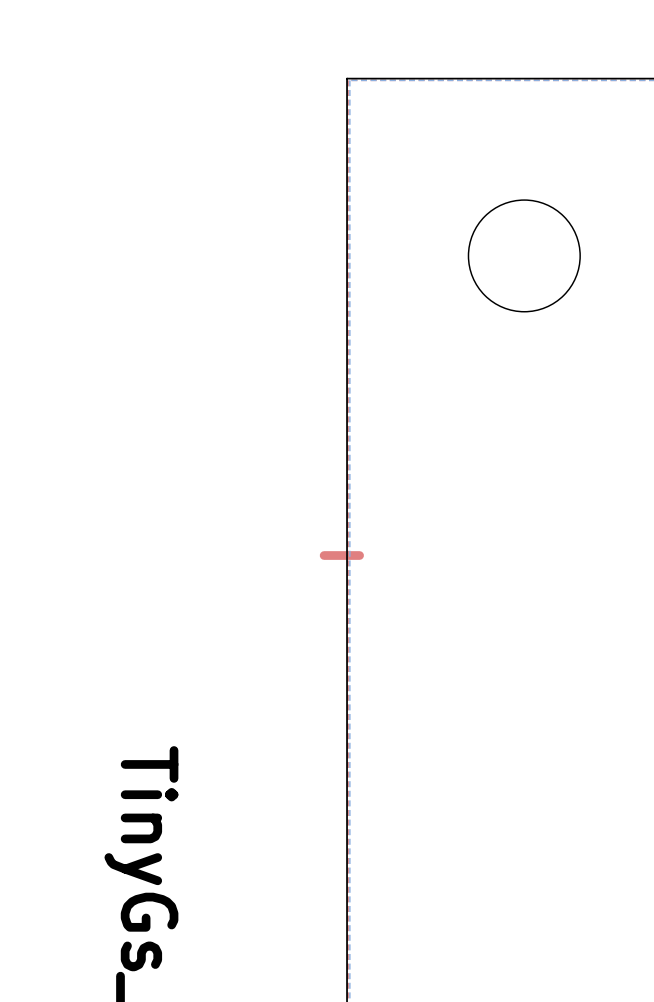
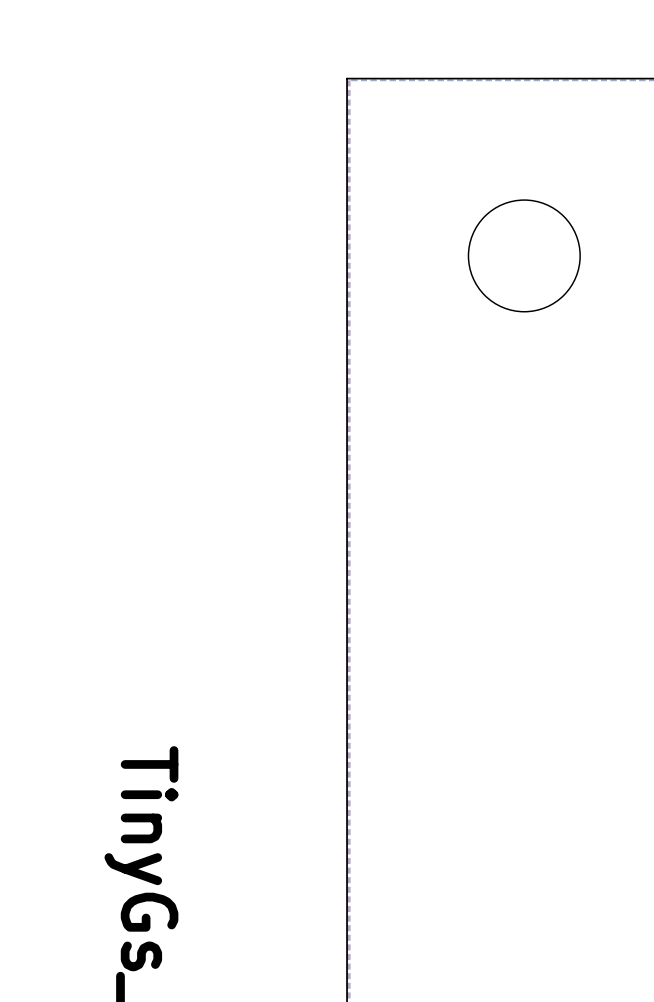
top track: (359, 555) (324, 555) -> none

